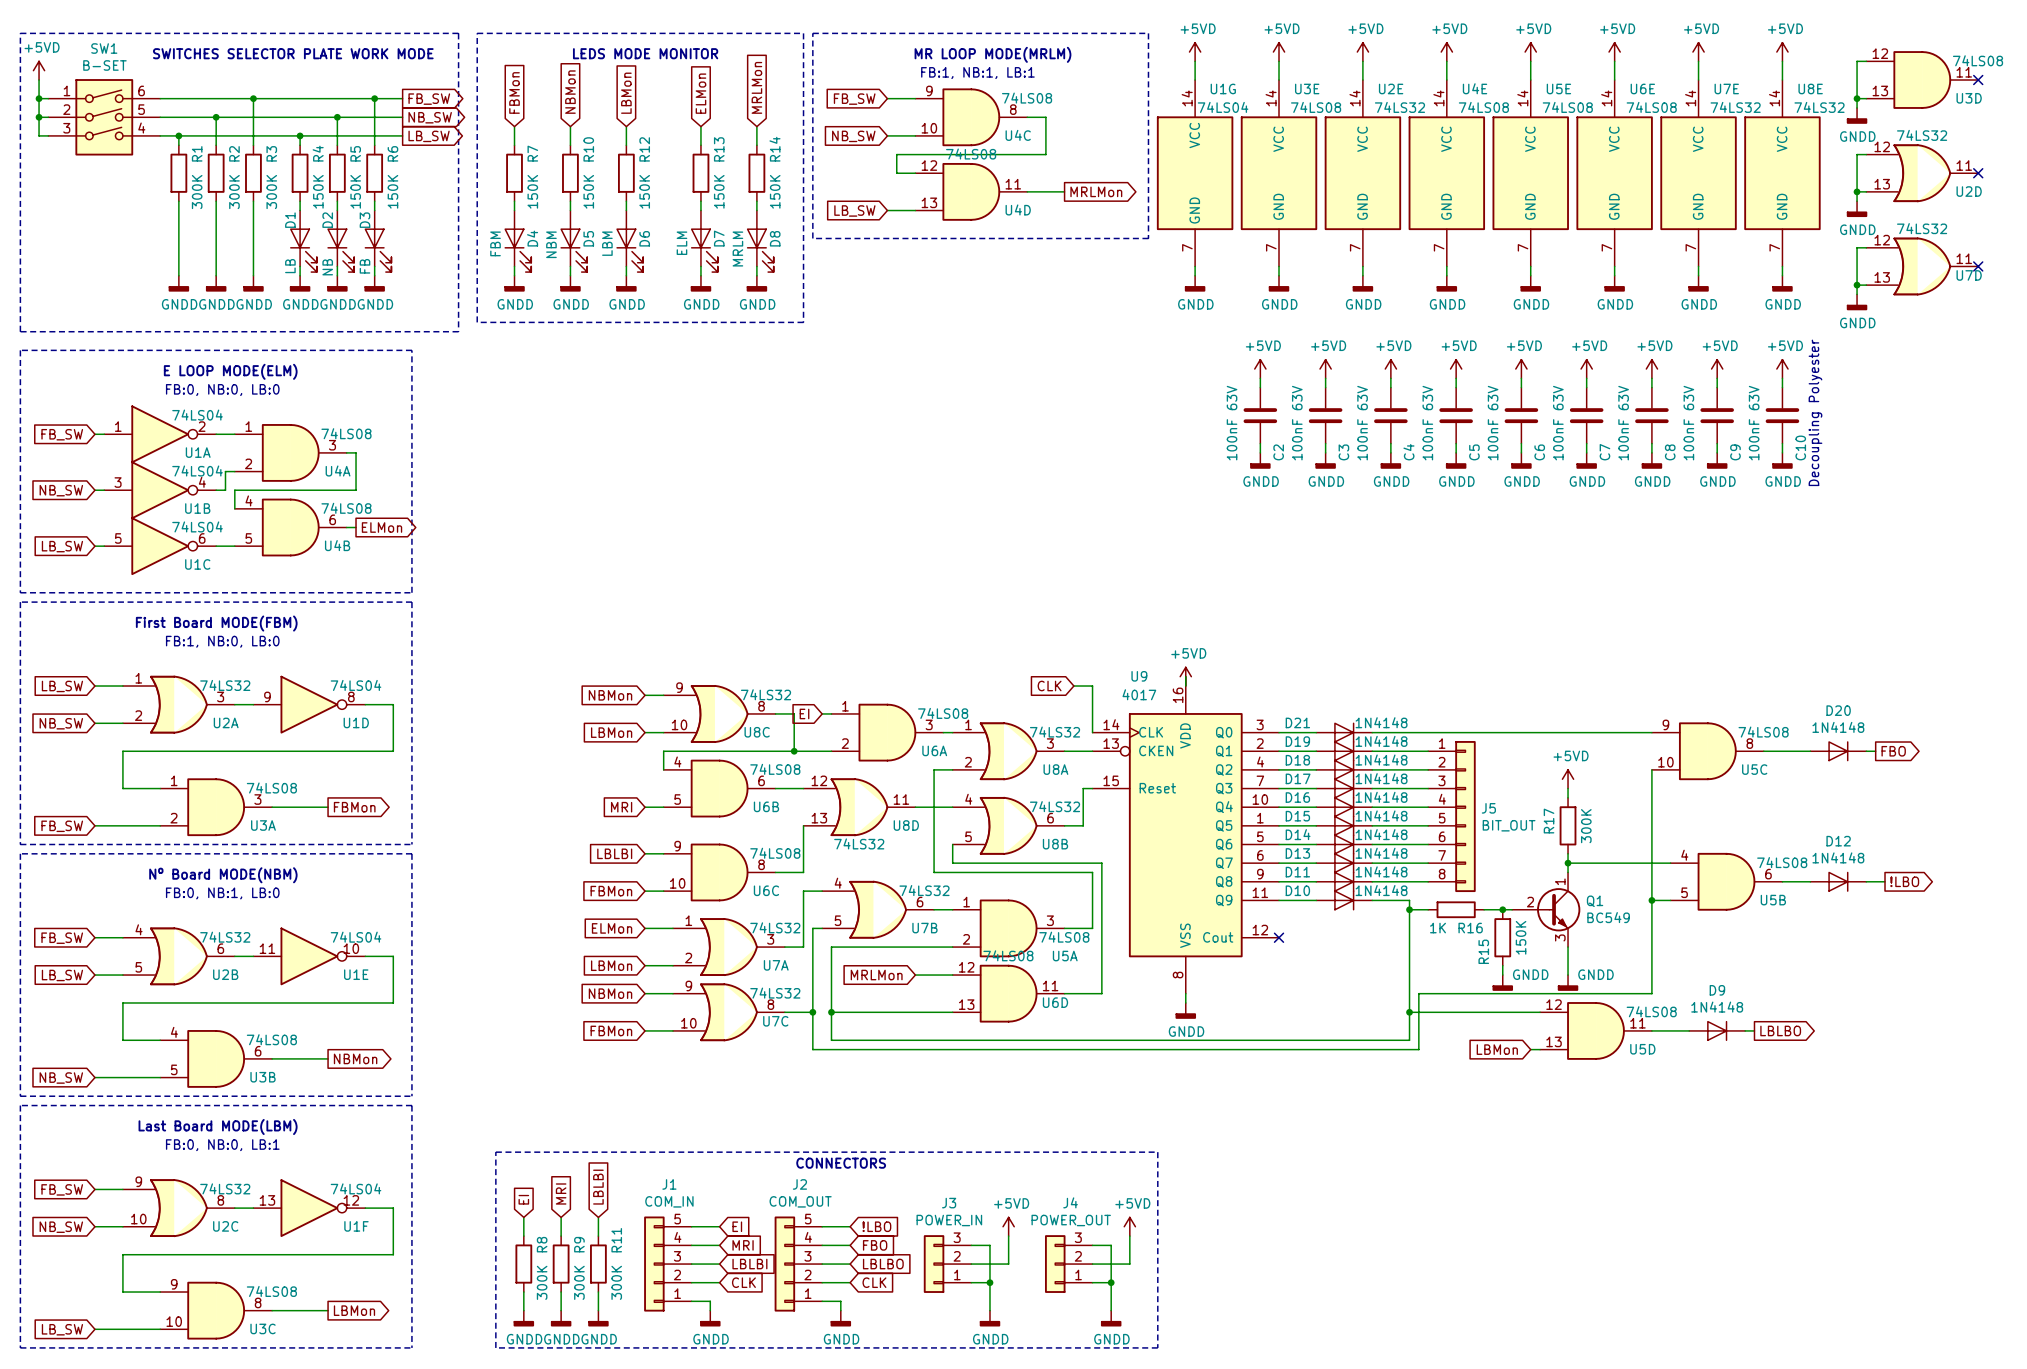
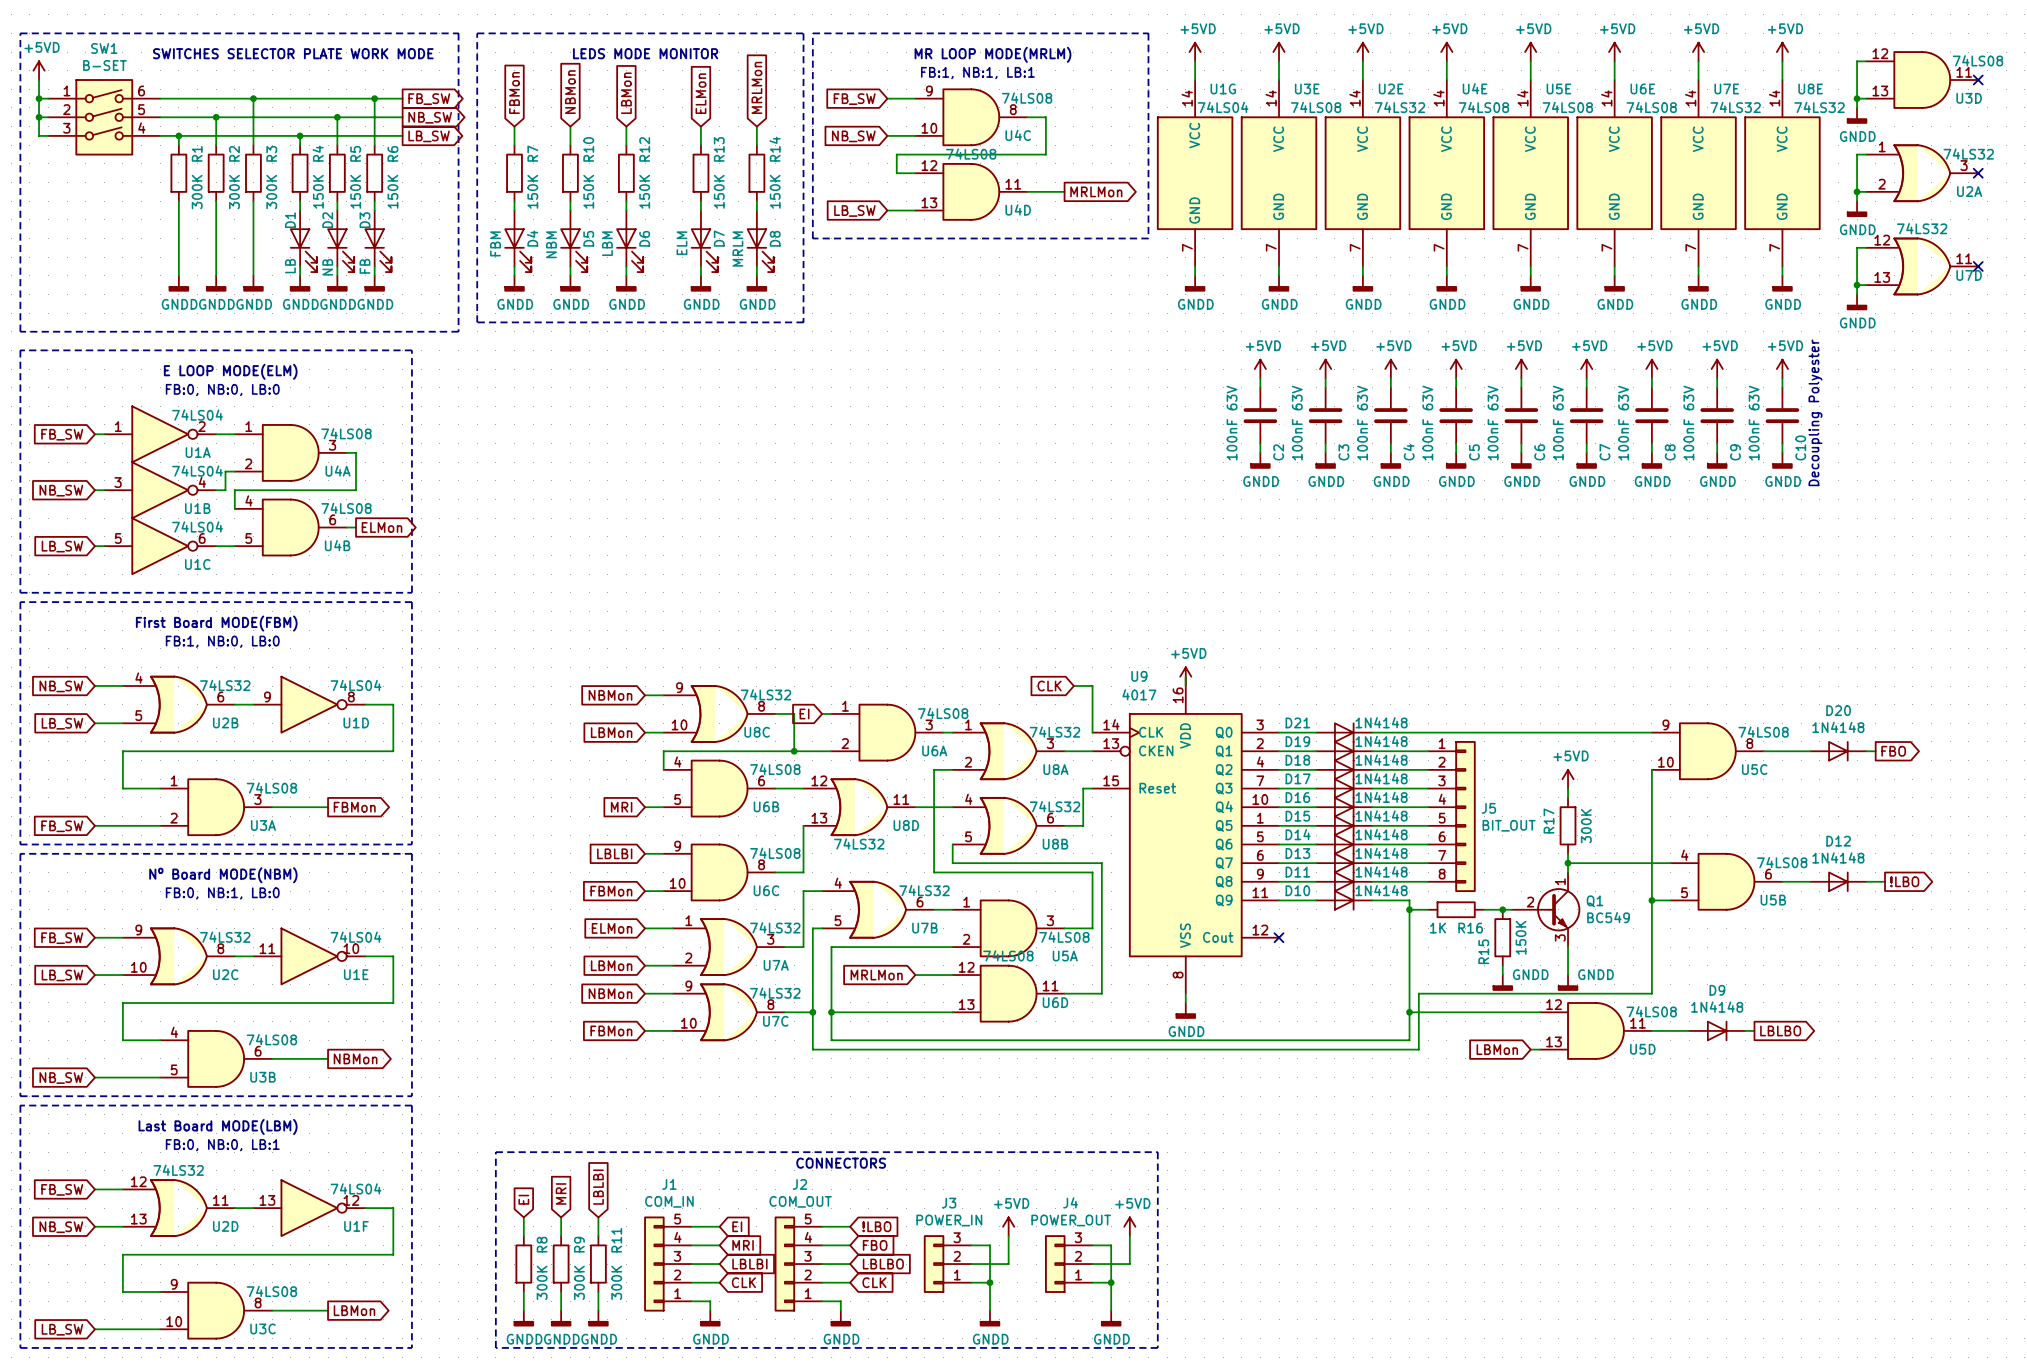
U2D position: (1922, 173) -> (178, 1208)
global label: LB_SW (62, 686) -> NB_SW (61, 686)
U2A position: (178, 704) -> (1922, 173)
global label: NB_SW (61, 723) -> LB_SW (62, 723)
U2B position: (178, 956) -> (178, 704)
U2C position: (178, 1208) -> (178, 956)

